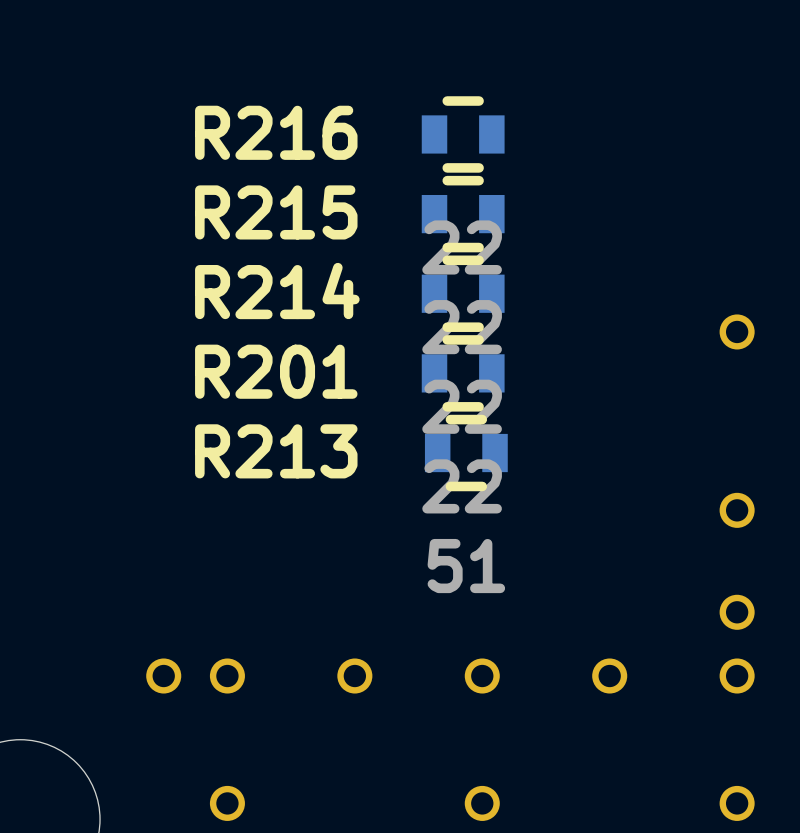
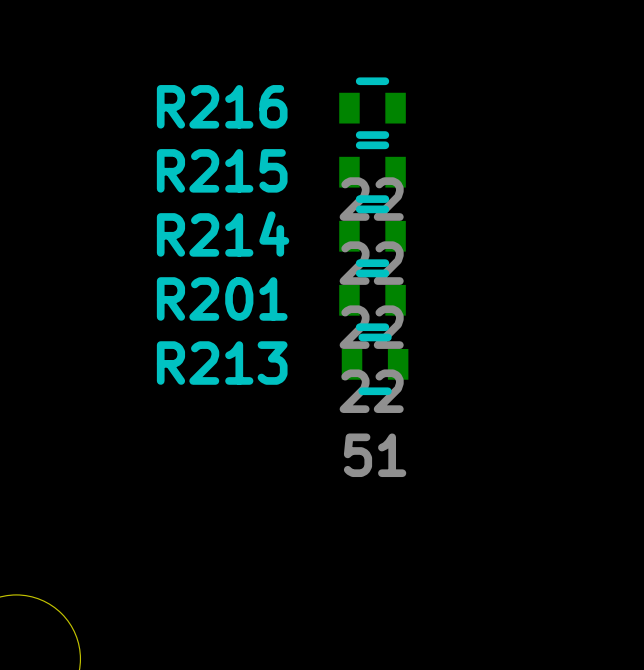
part: (737, 331) -> none
part: (737, 510) -> none
part: (737, 612) -> none
part: (163, 676) -> none
part: (227, 676) -> none
part: (354, 676) -> none
part: (482, 676) -> none
part: (609, 676) -> none
part: (737, 676) -> none
part: (227, 803) -> none
part: (482, 803) -> none
part: (737, 803) -> none

